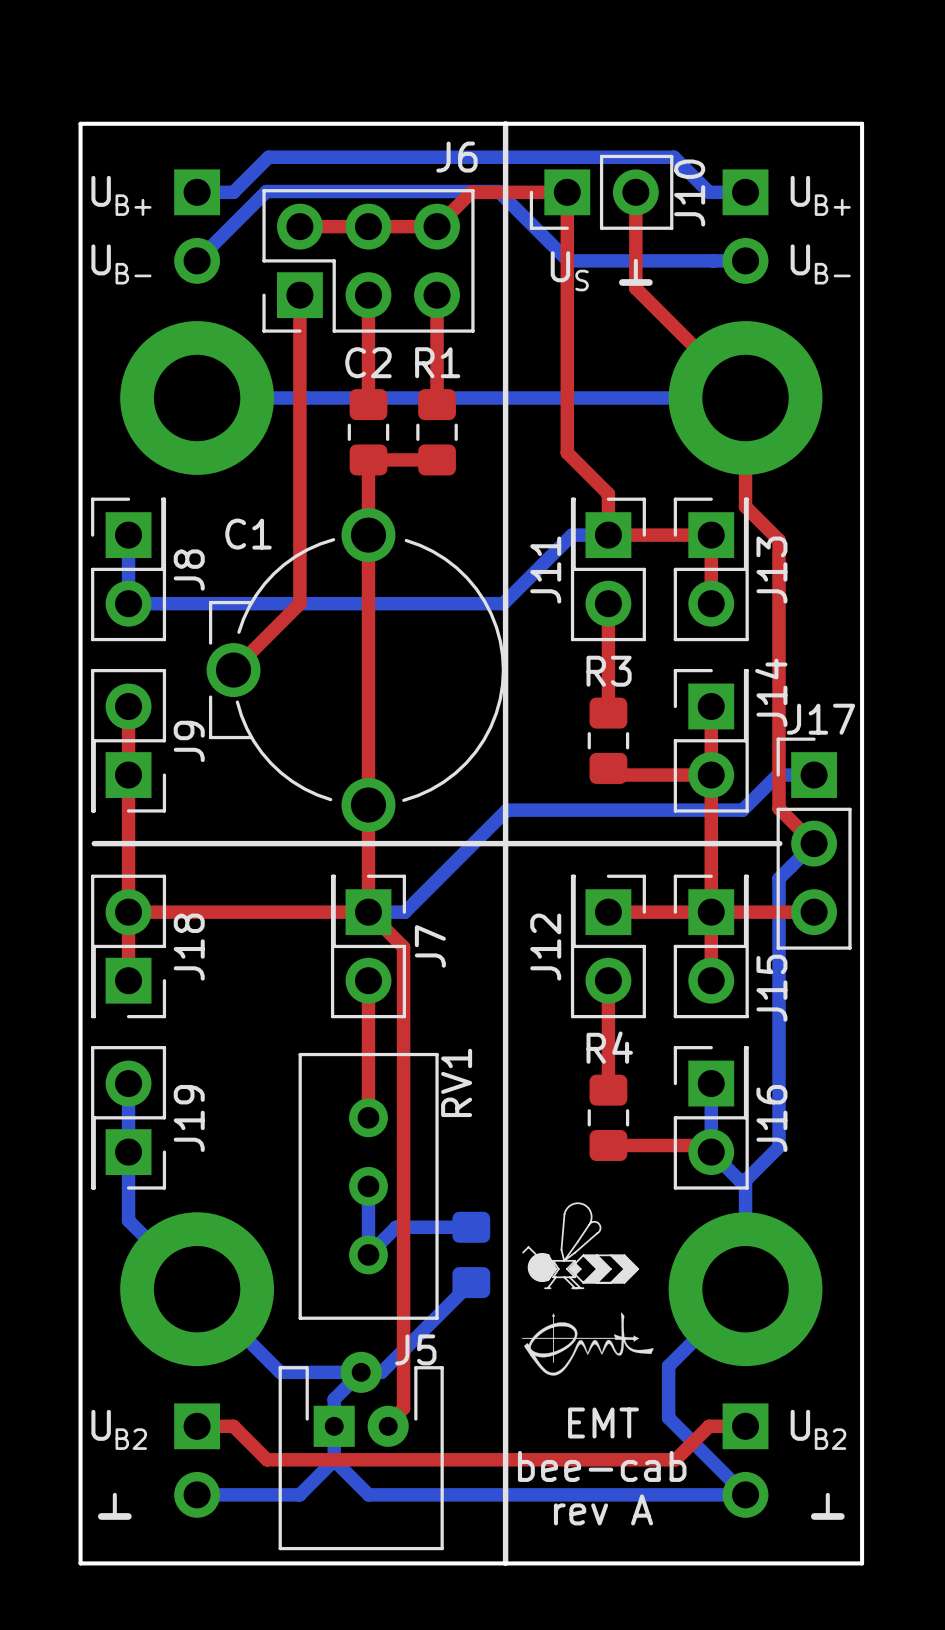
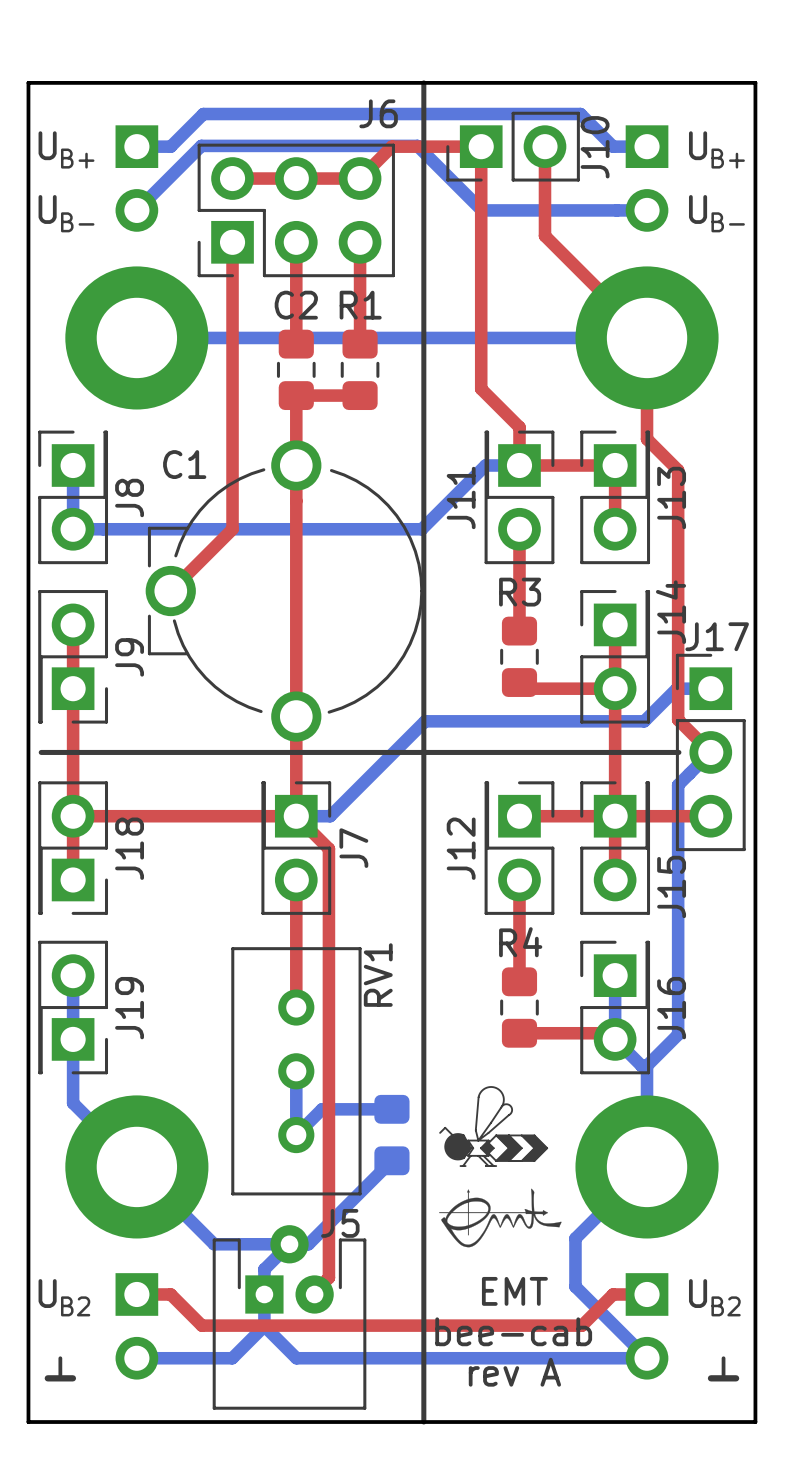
drawing: [618, 258, 653, 286] -> none

